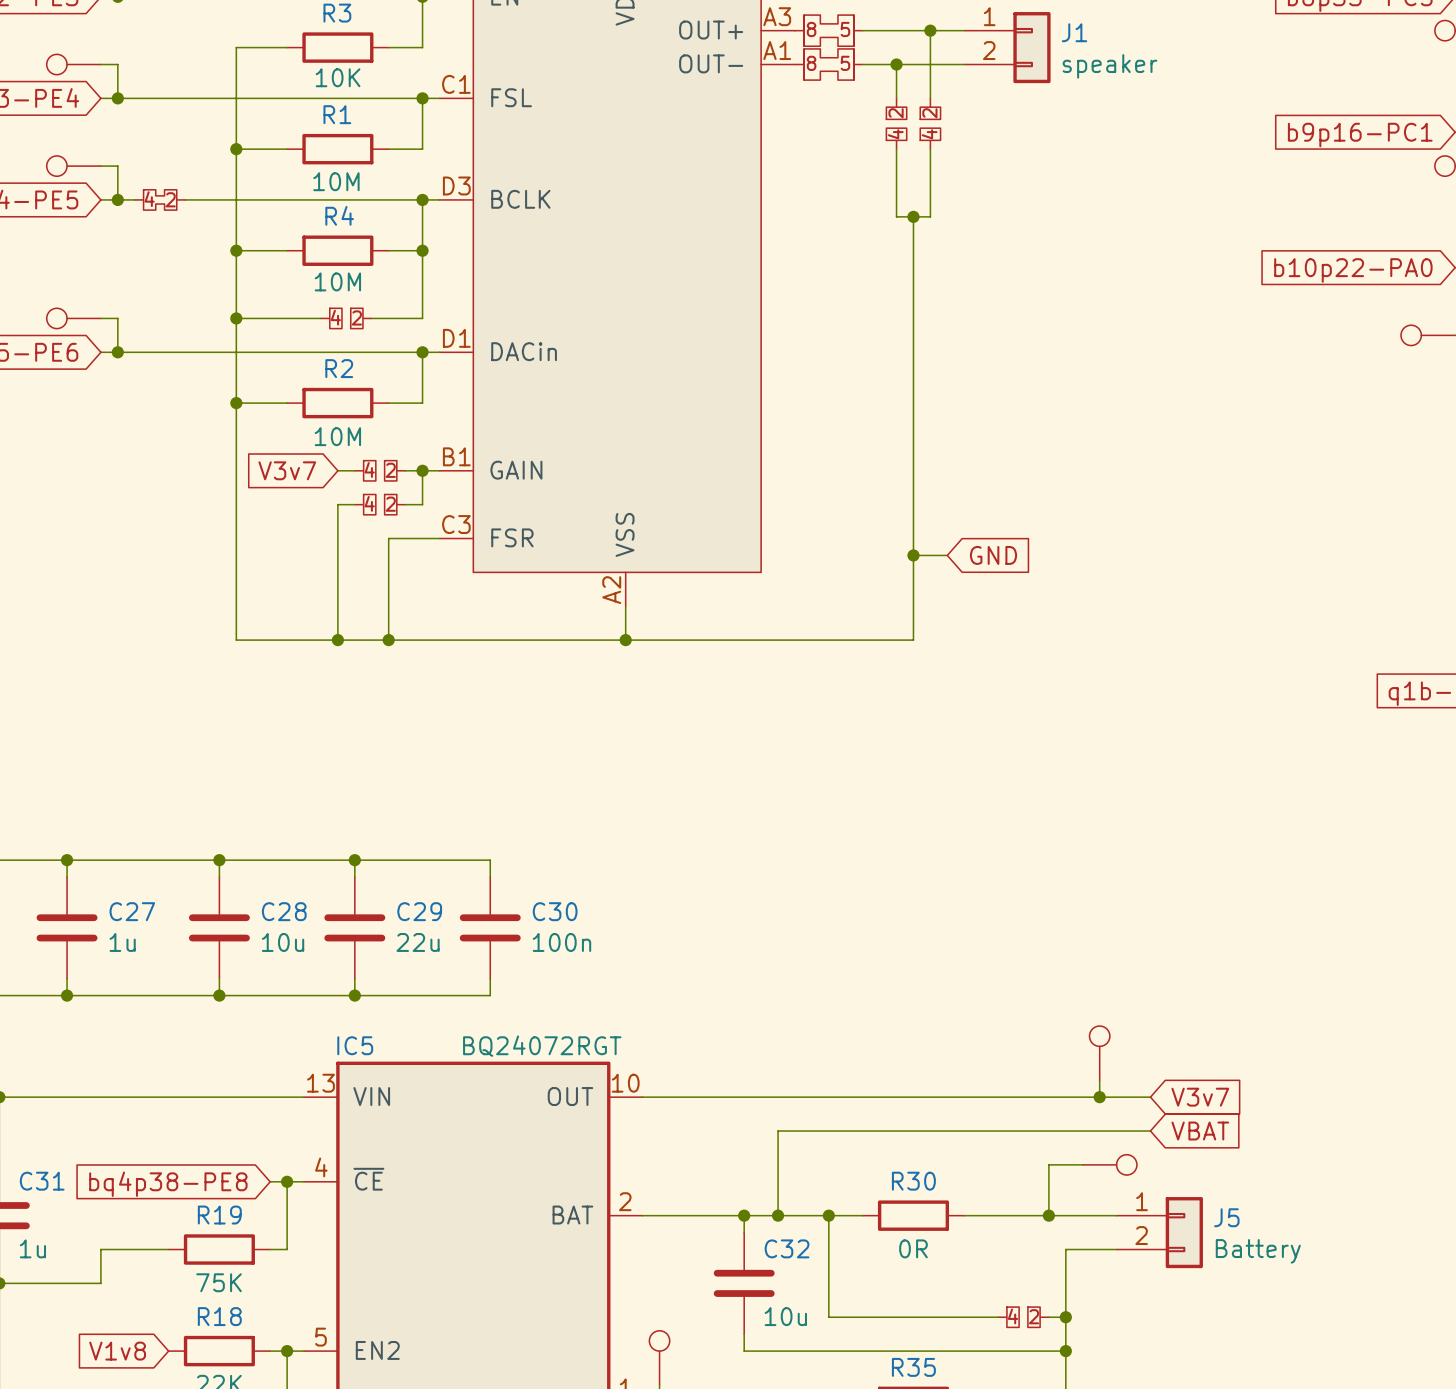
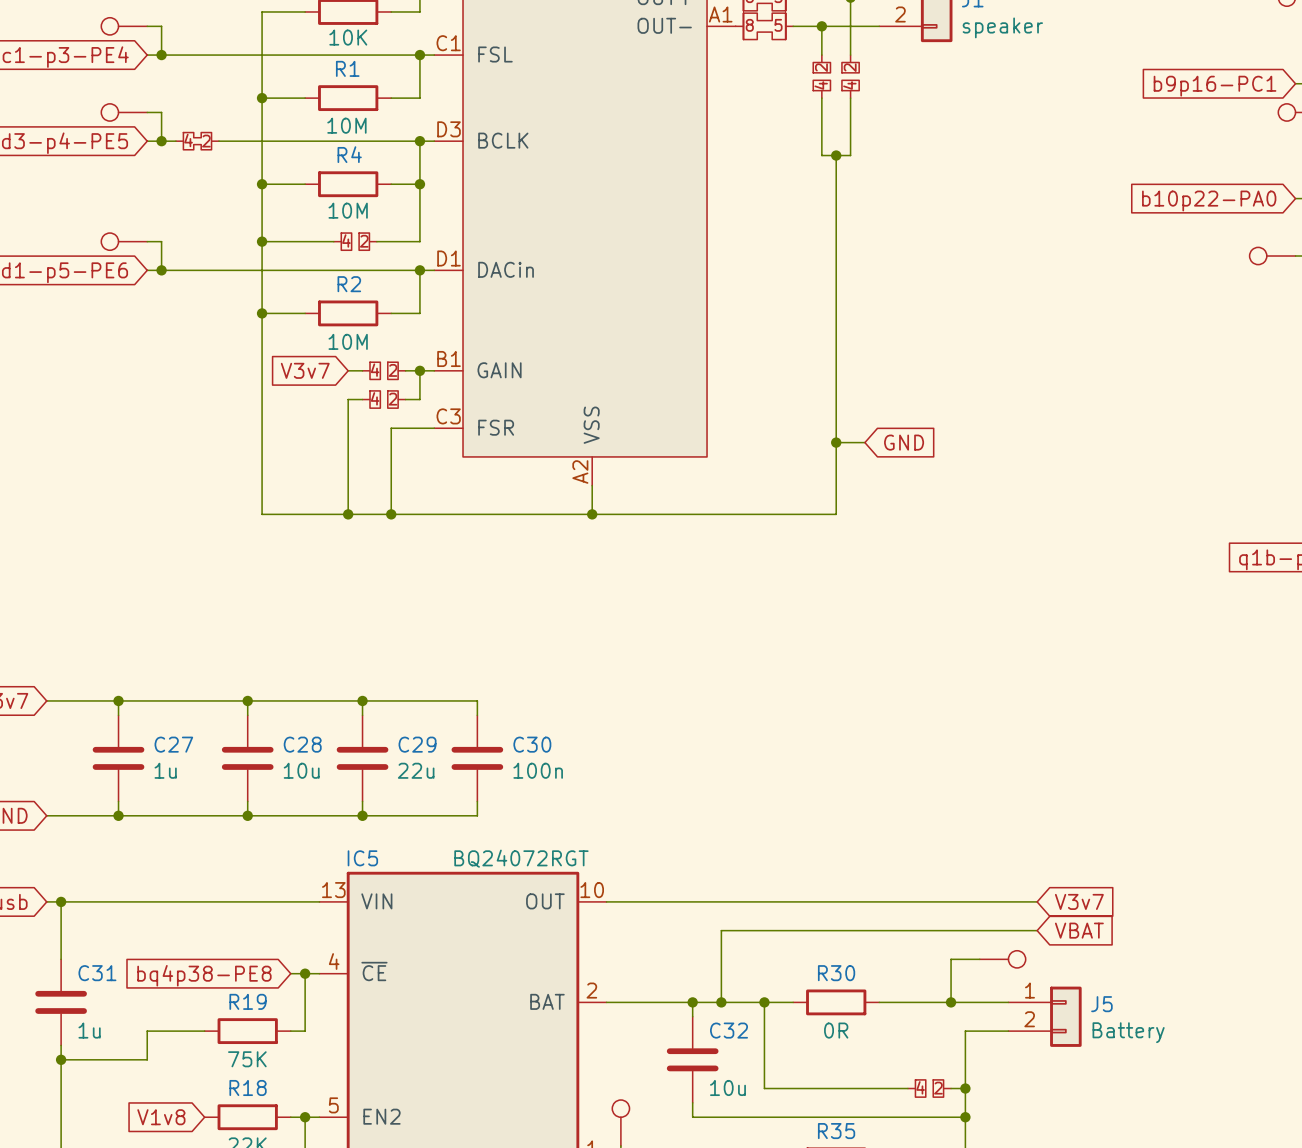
part: (1099, 1053) -> none
wire: (1099, 1080) (1099, 1097) -> none
junction: (1099, 1097) -> none

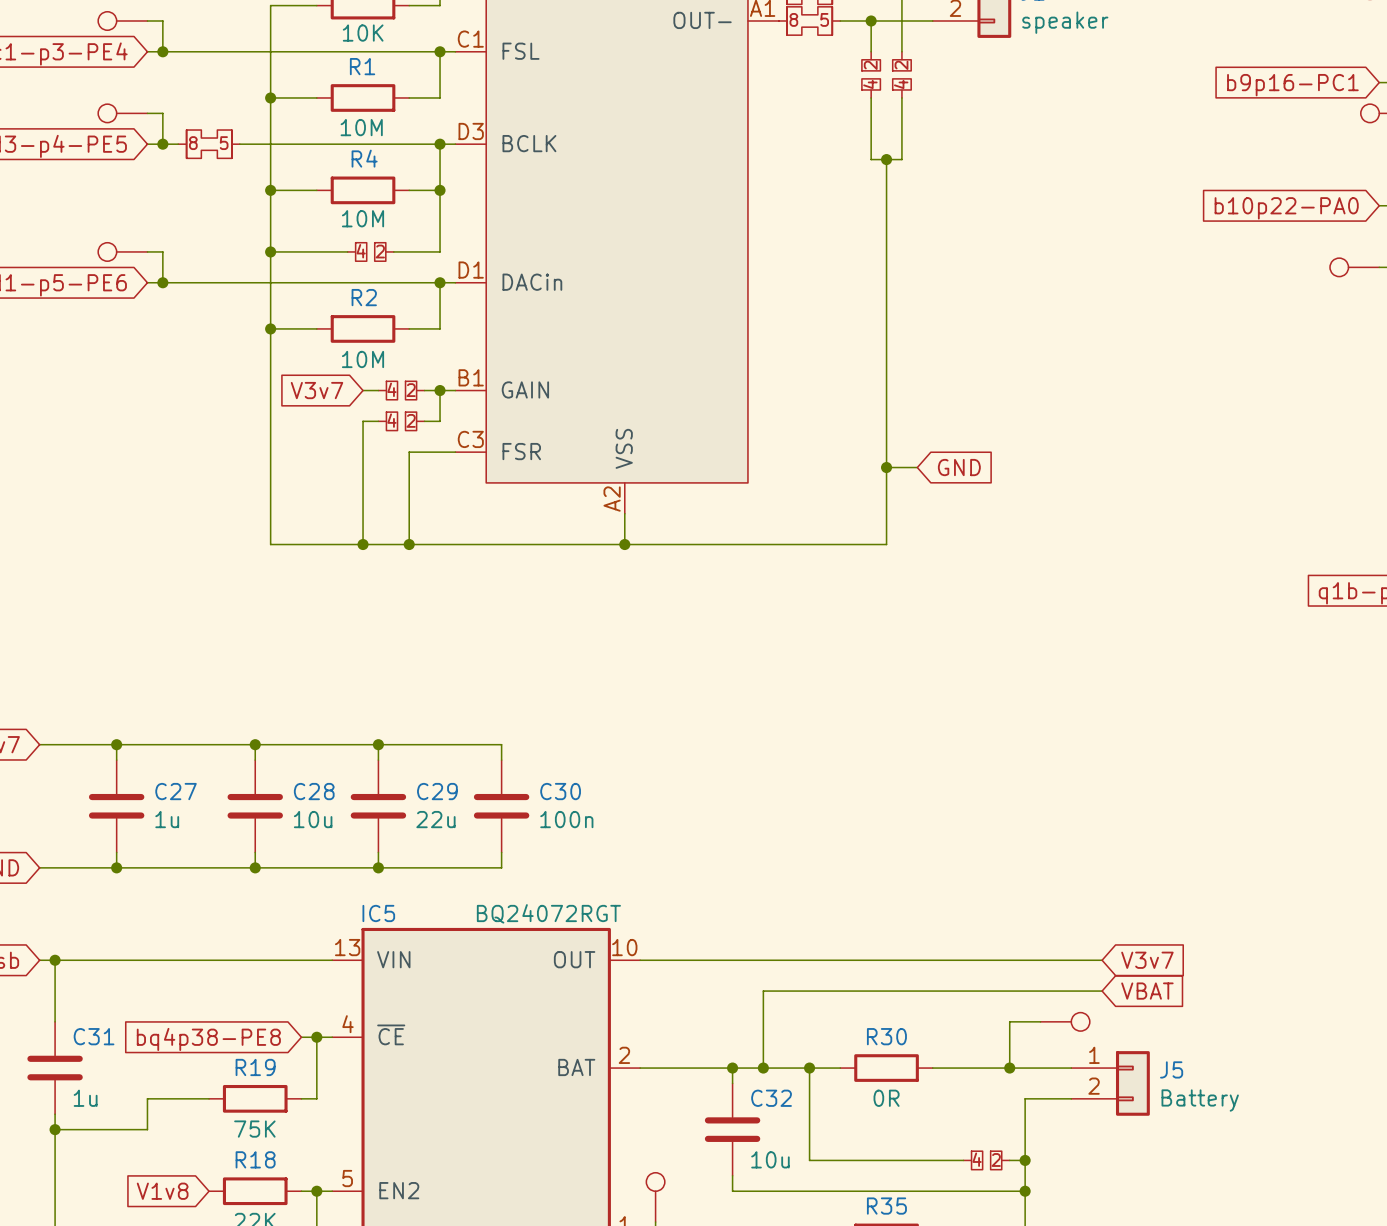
part symbol: [175, 131, 220, 151] -> [178, 129, 240, 159]

